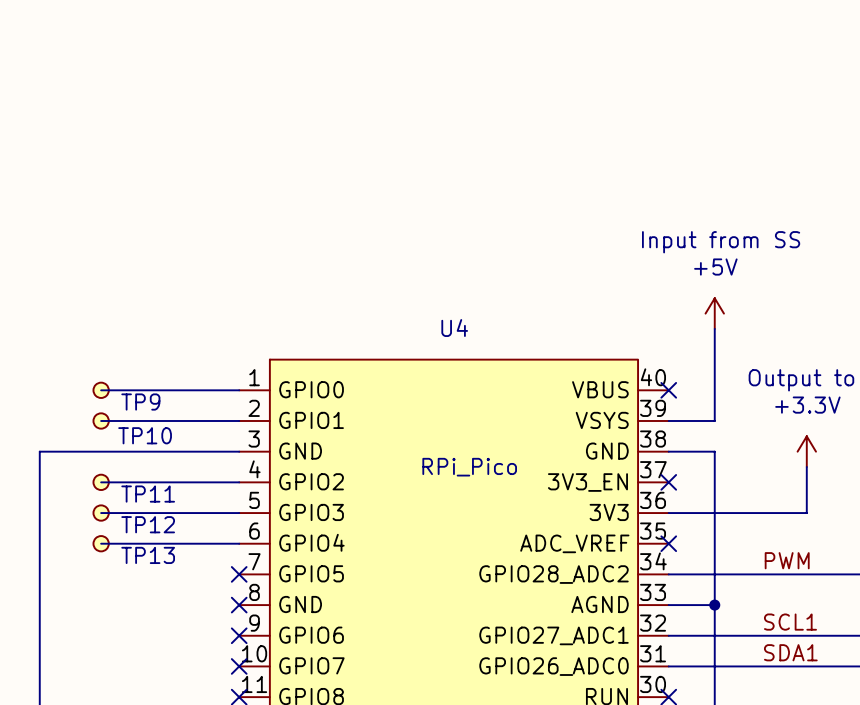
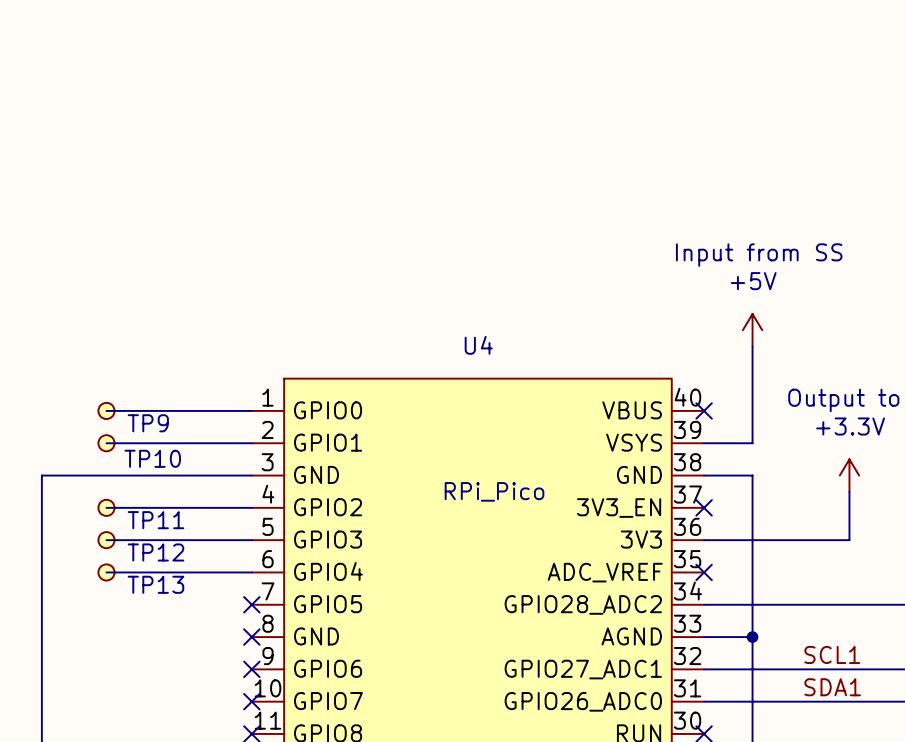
label: PWM (787, 560) -> none

